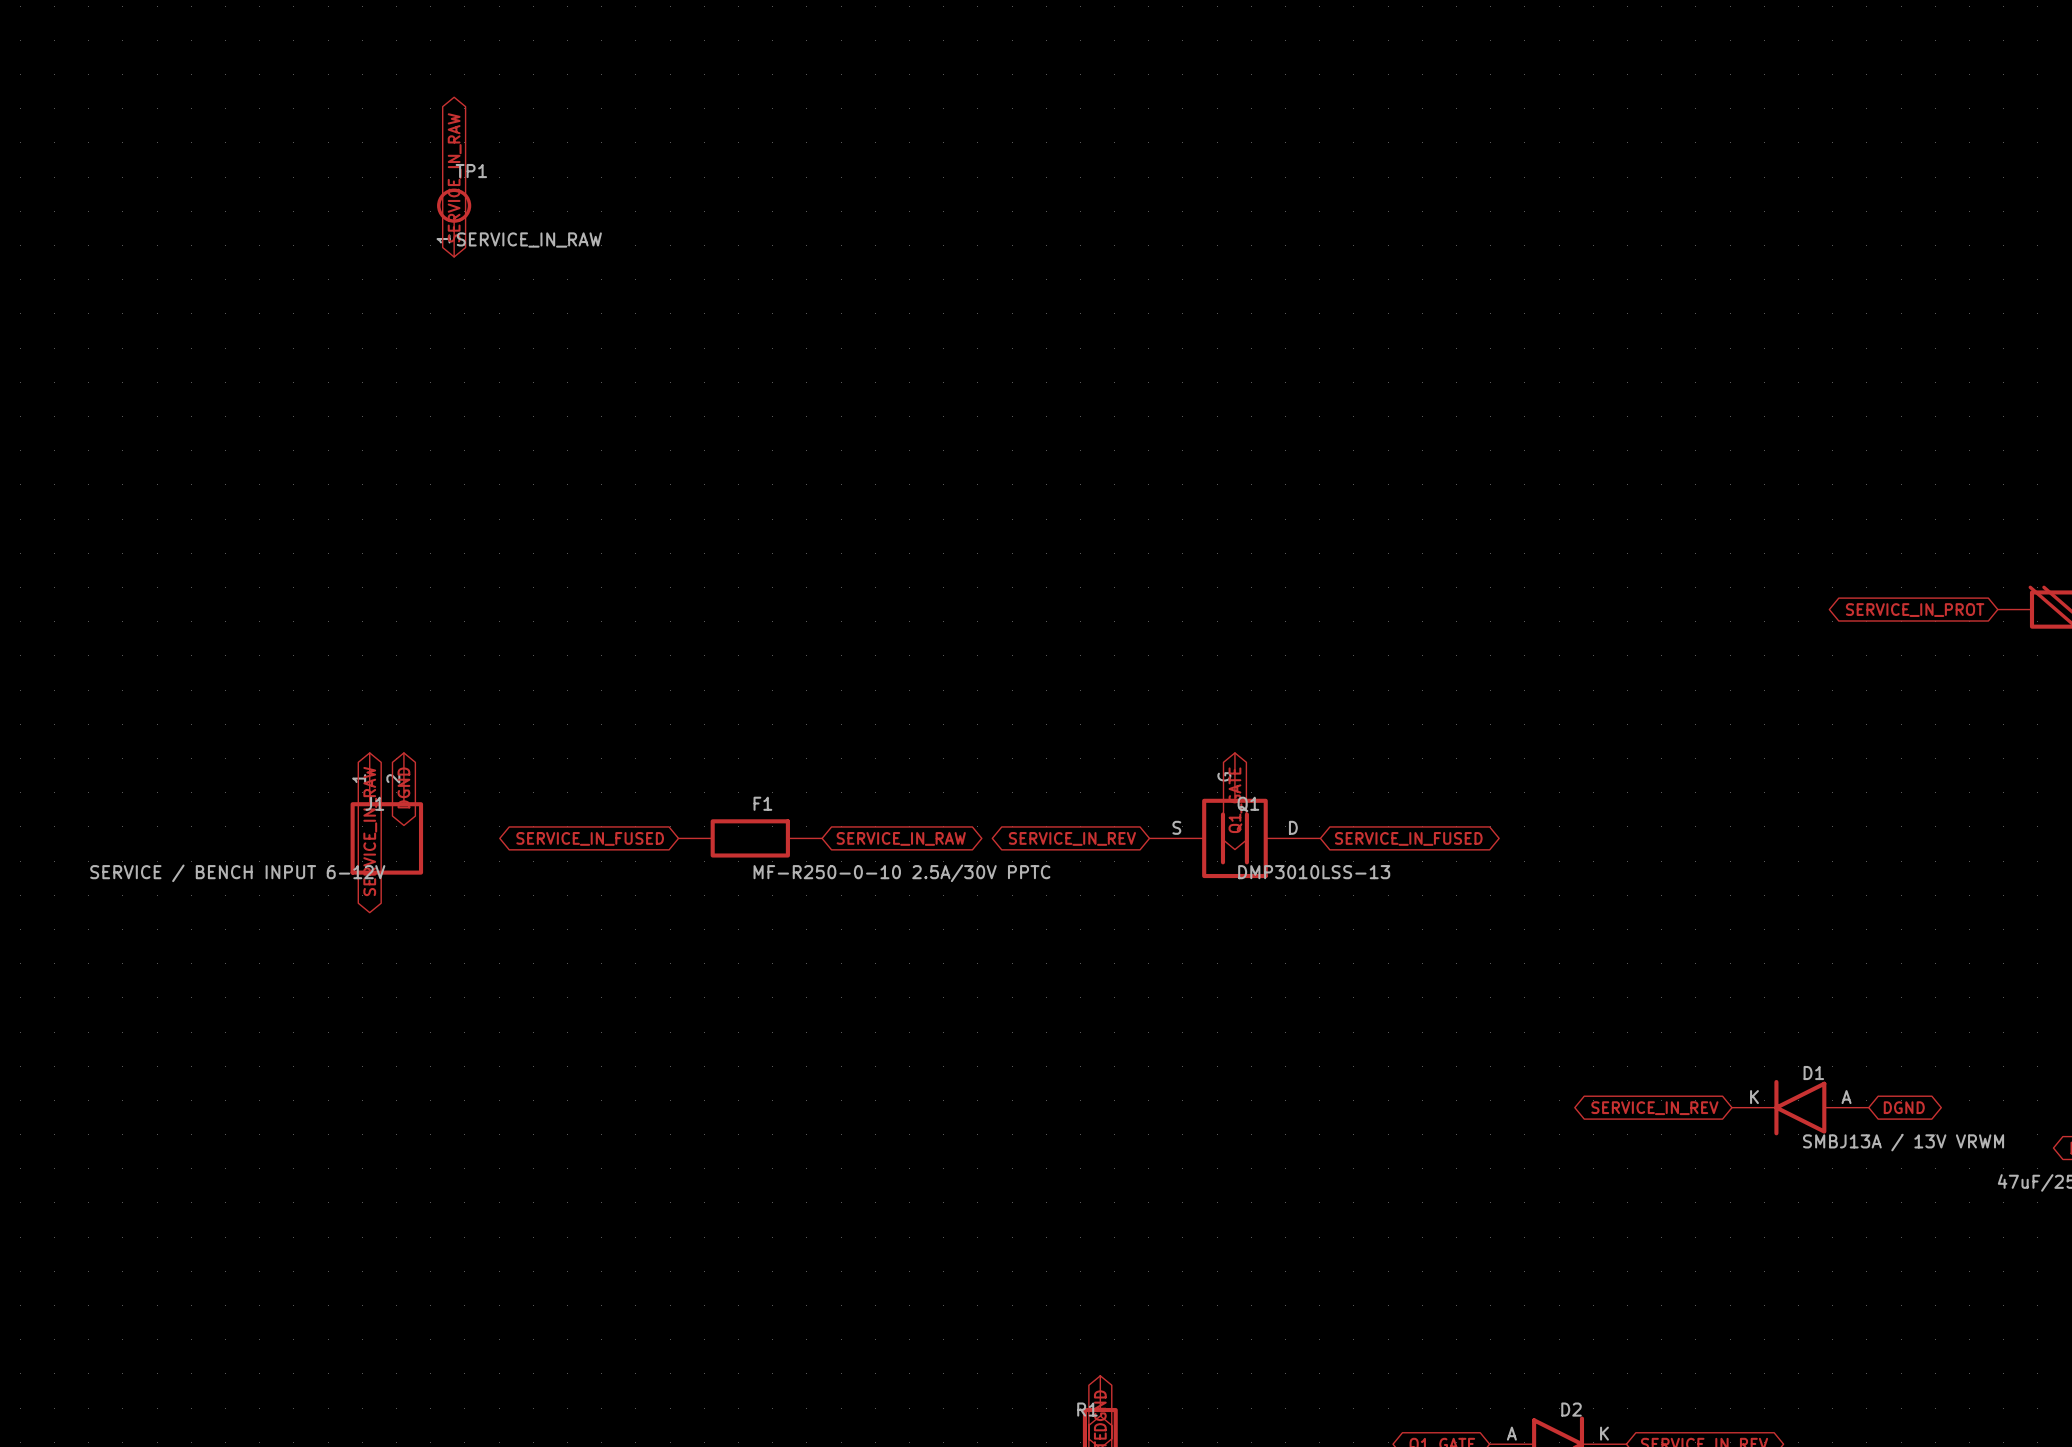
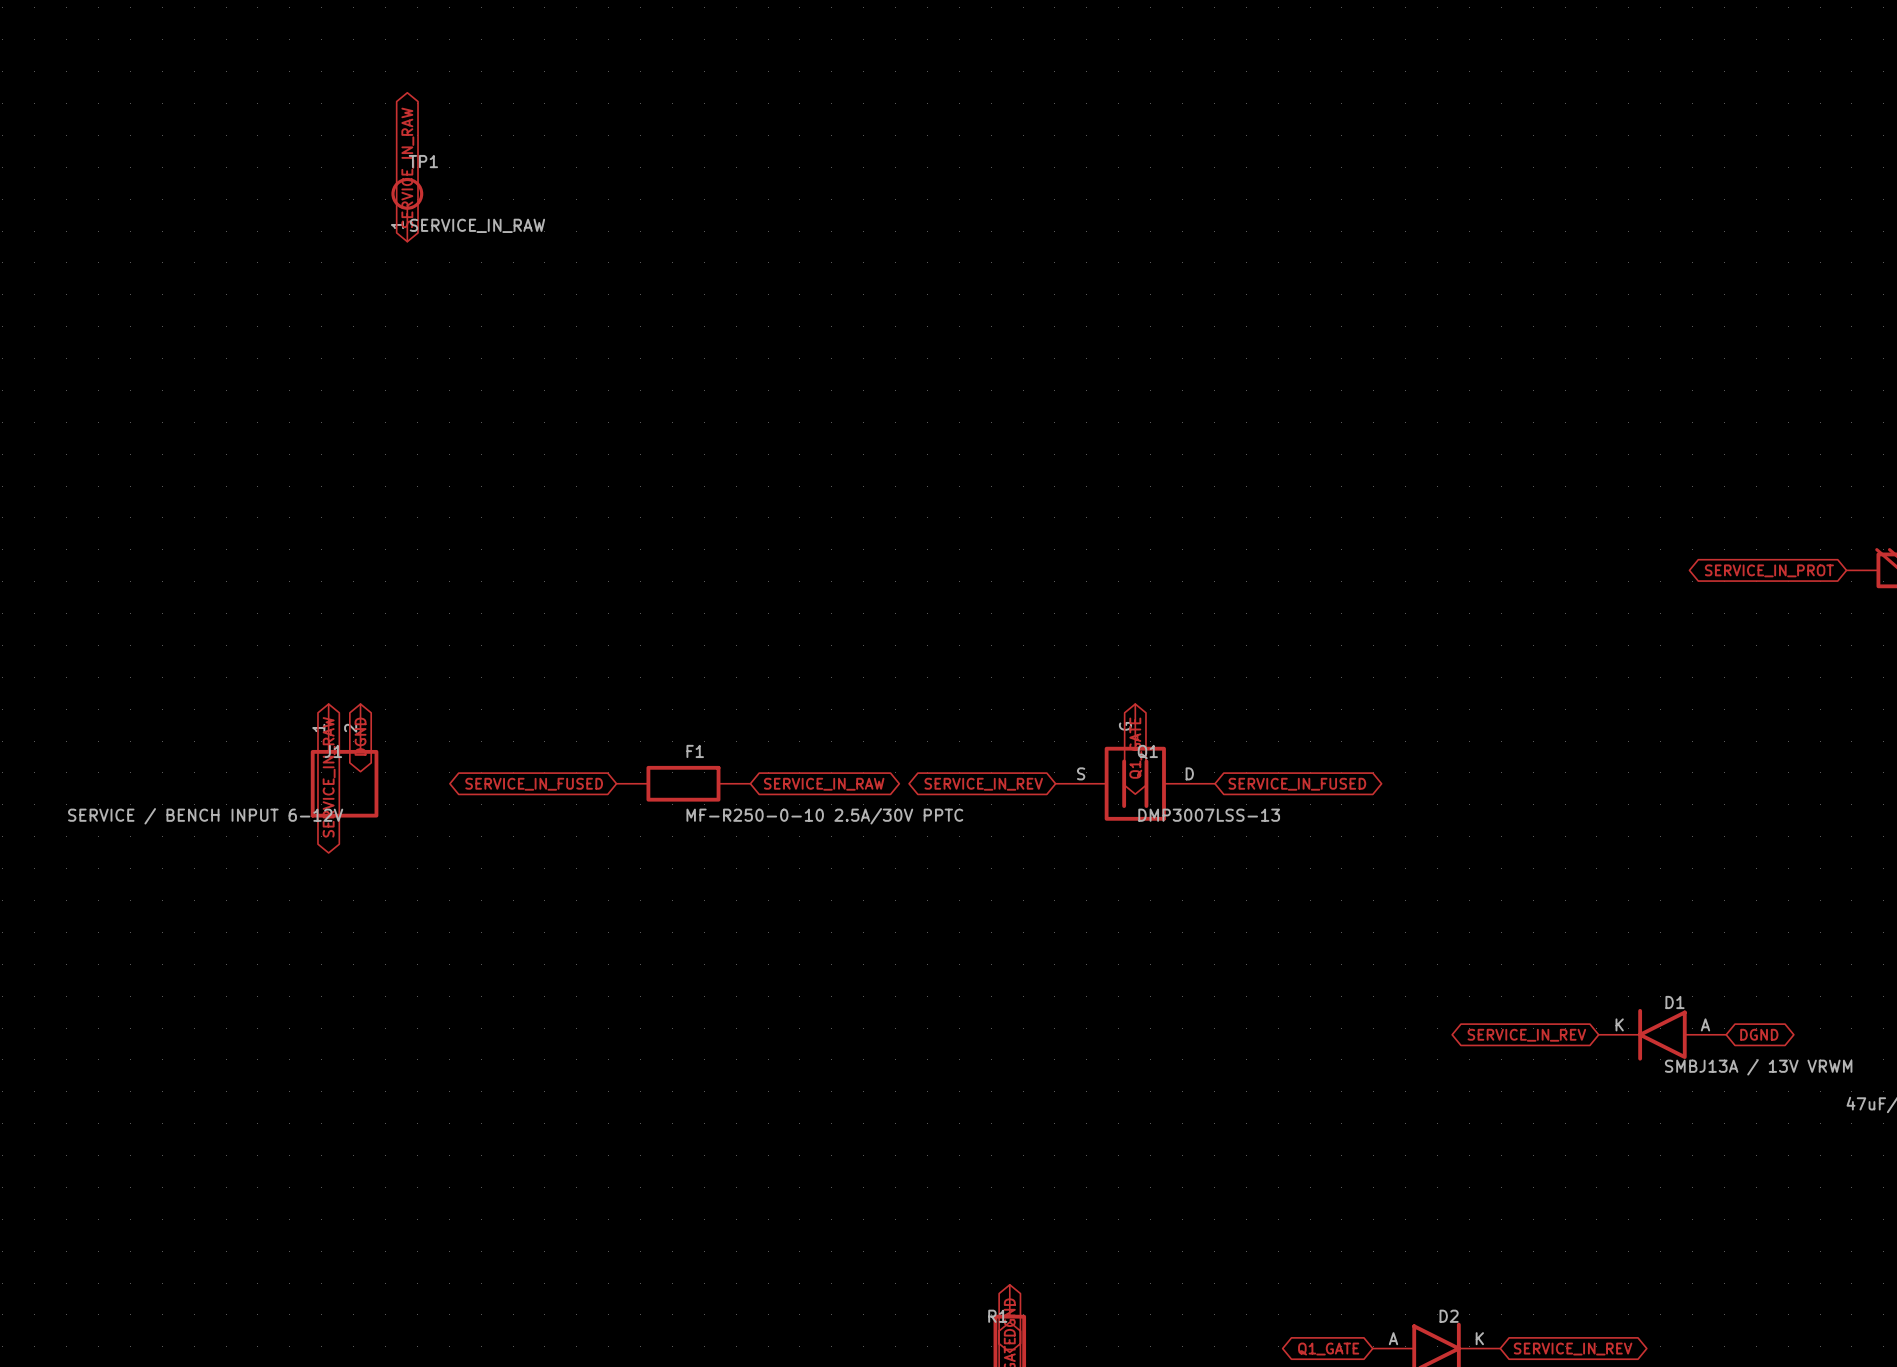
Q1 value: DMP3010LSS-13 (1314, 872) -> DMP3007LSS-13 (1209, 815)

